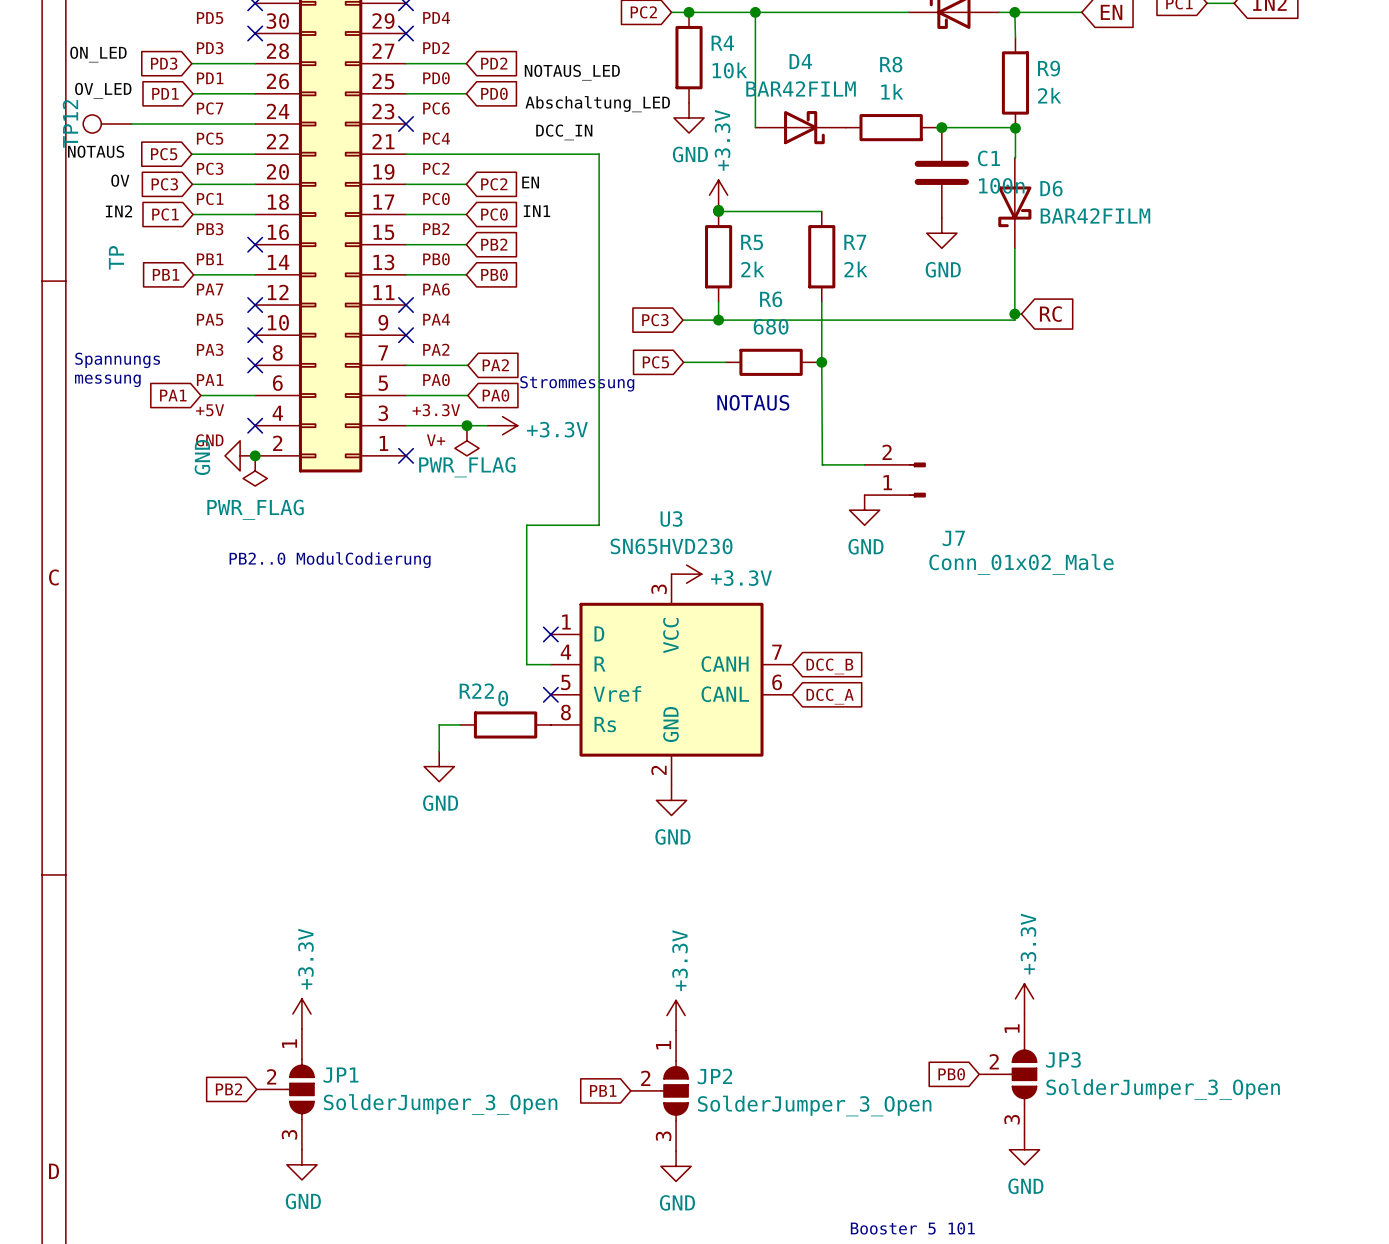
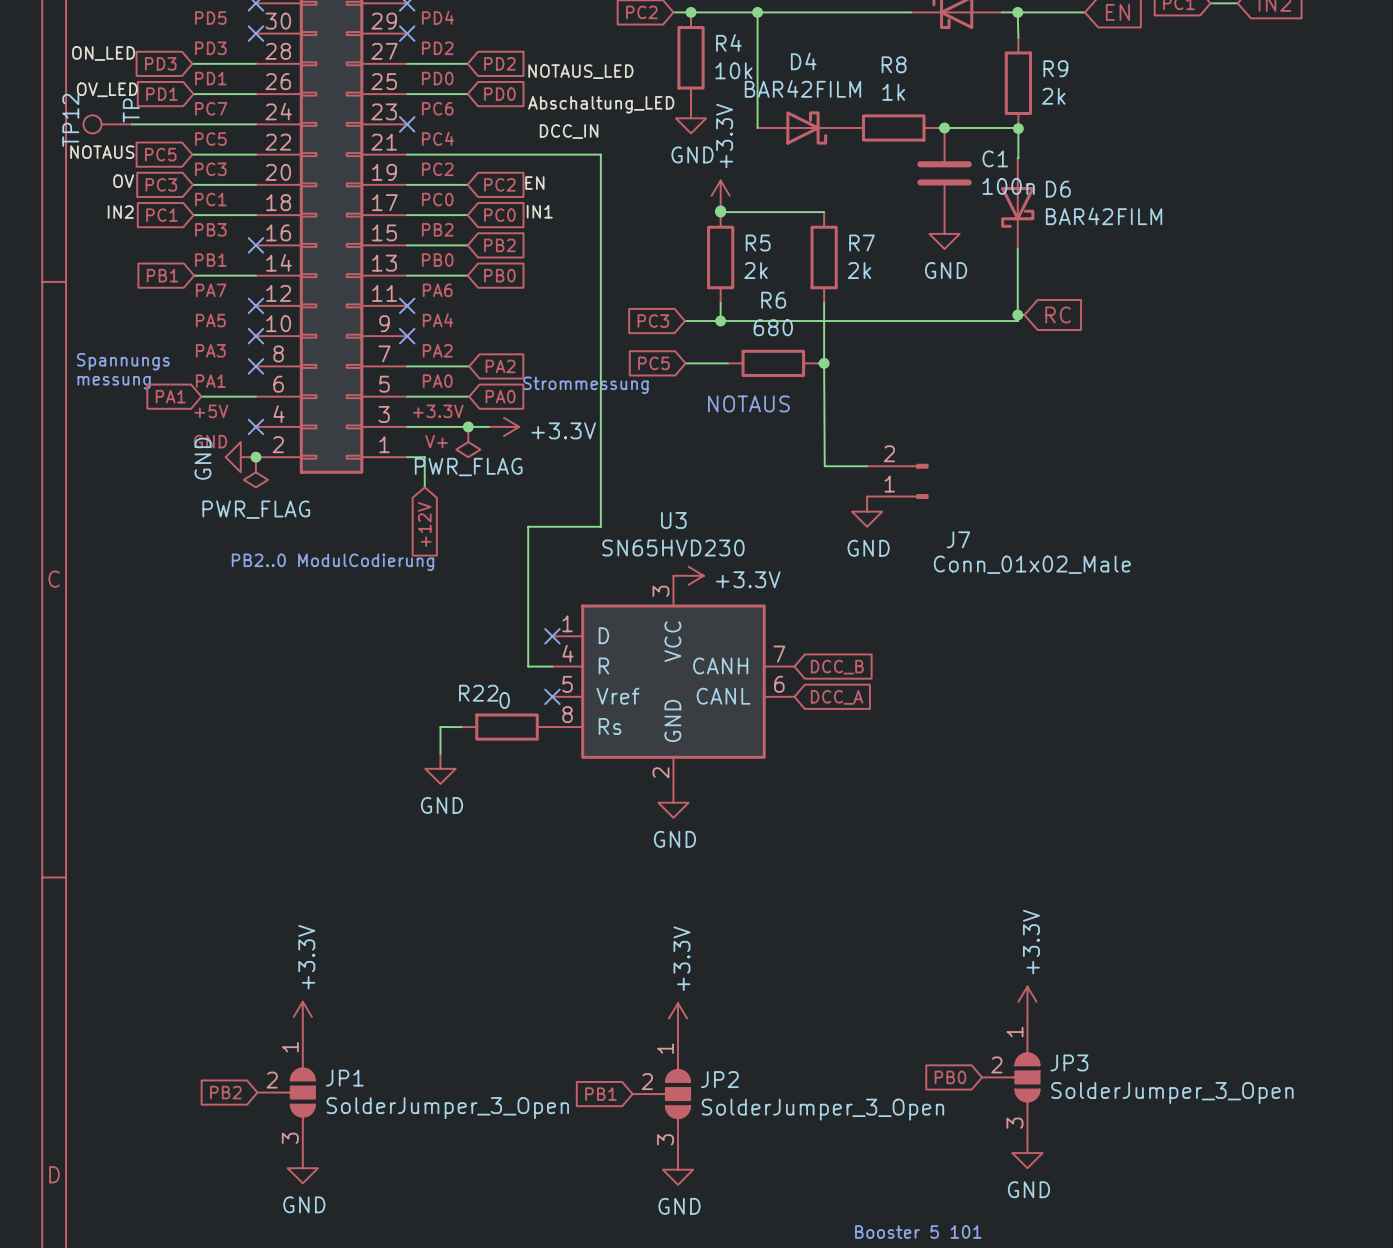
TP12 value position: TP (116, 257) -> TP (131, 110)
wire: none -> (407, 457) (424, 457) (424, 487)
no-connect mark: (406, 455) -> none
global label: none -> +12V (424, 524)

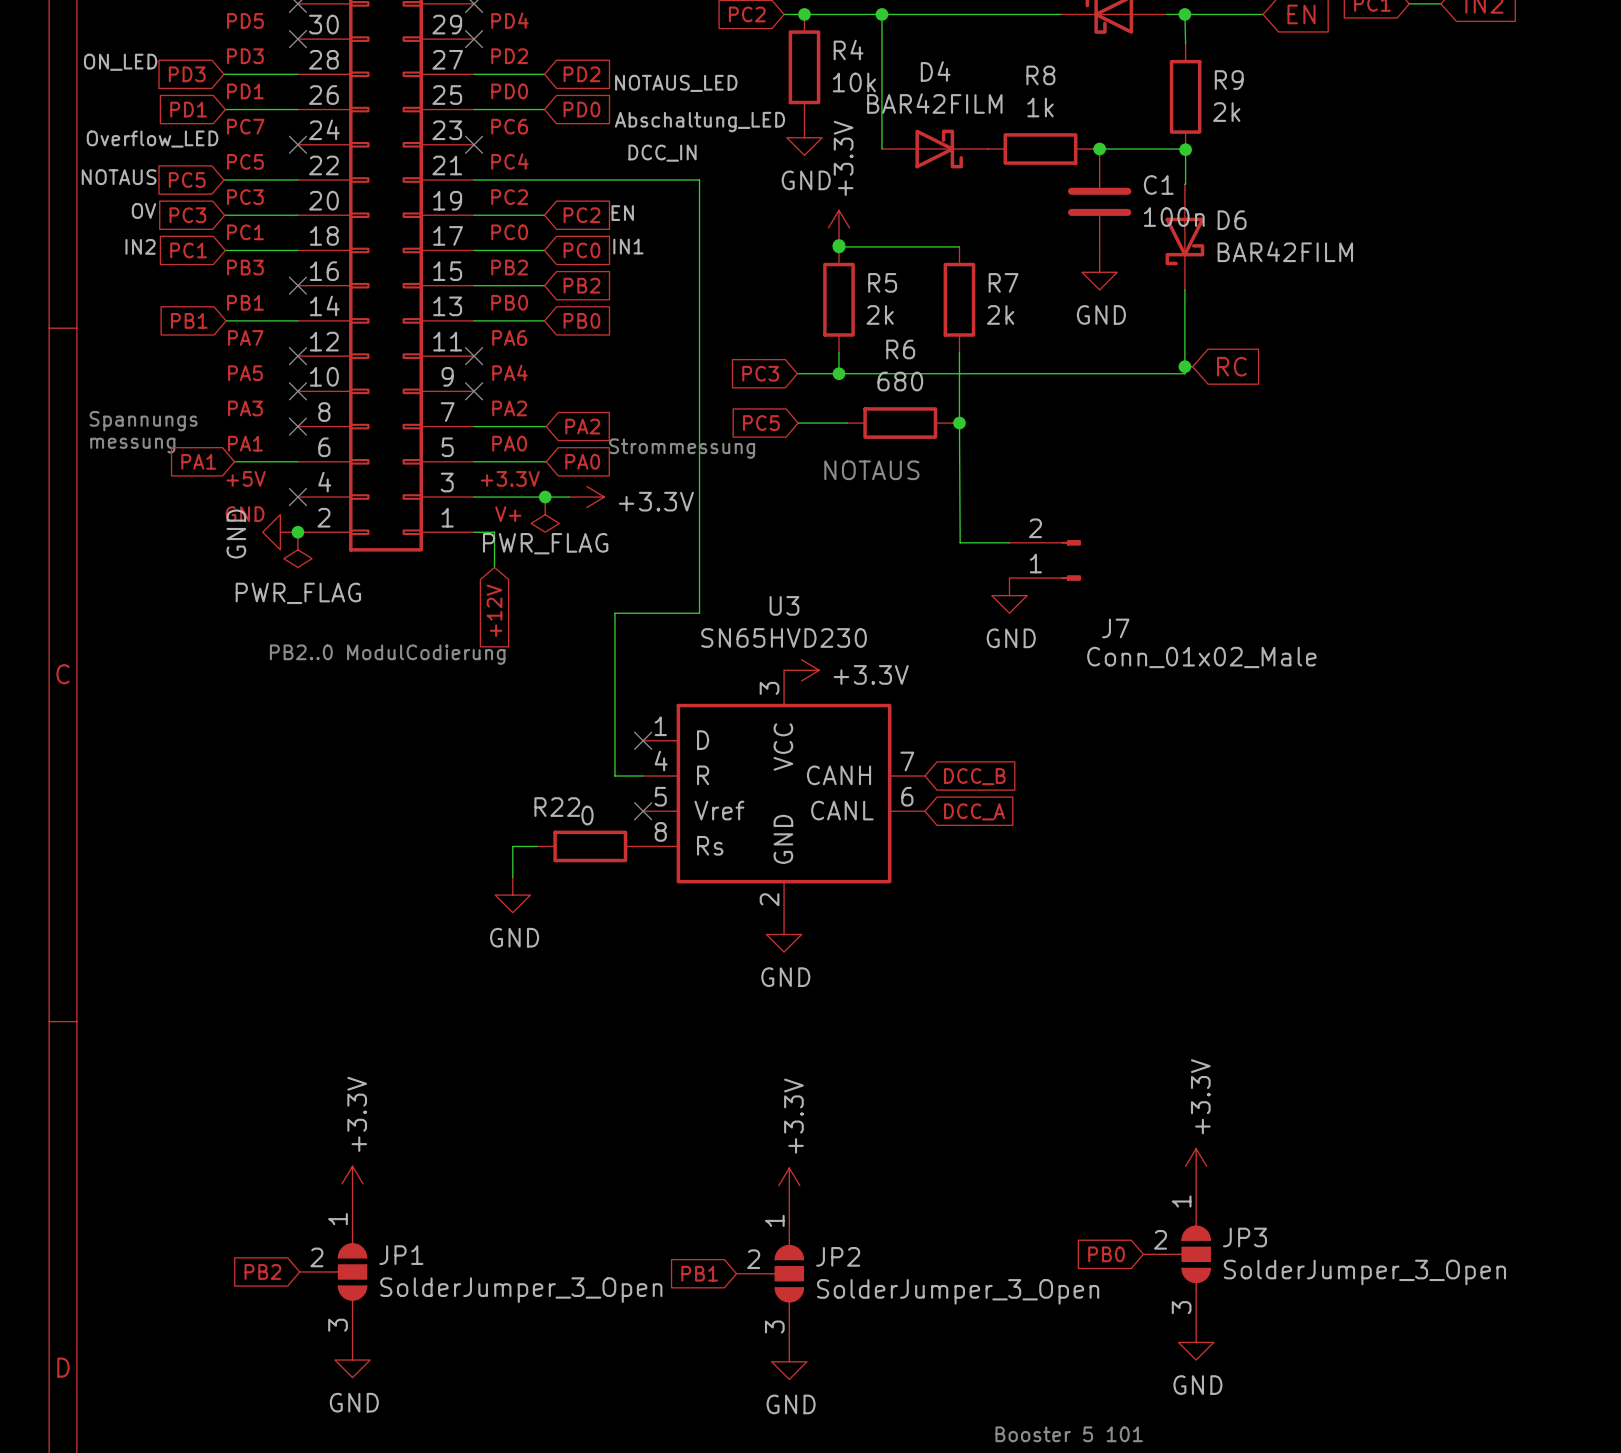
label: OV_LED (107, 89) -> none
label: none -> Overflow_LED (152, 139)
TP12: TP (107, 124) -> none
wire: (131, 124) (255, 124) -> none
no-connect mark: none -> (297, 144)

